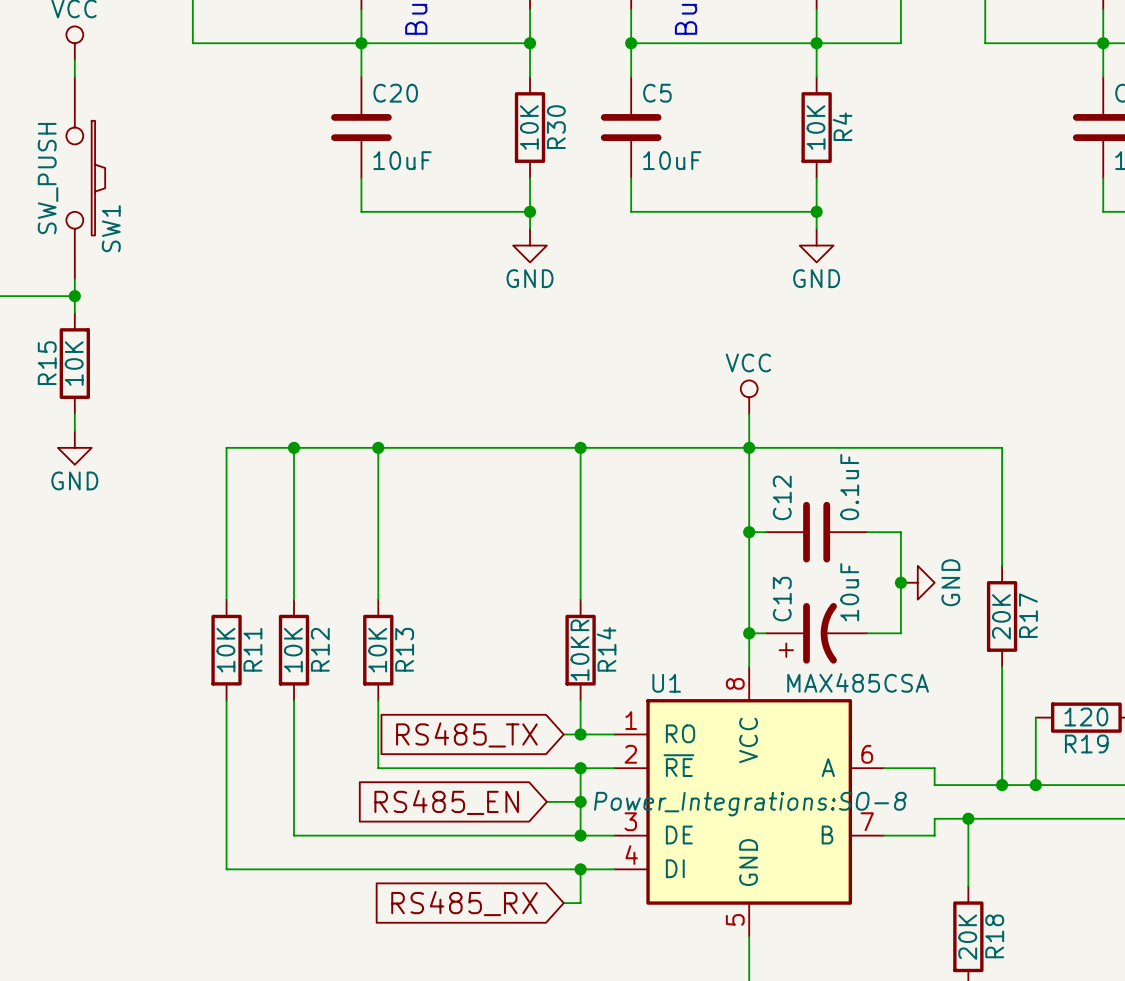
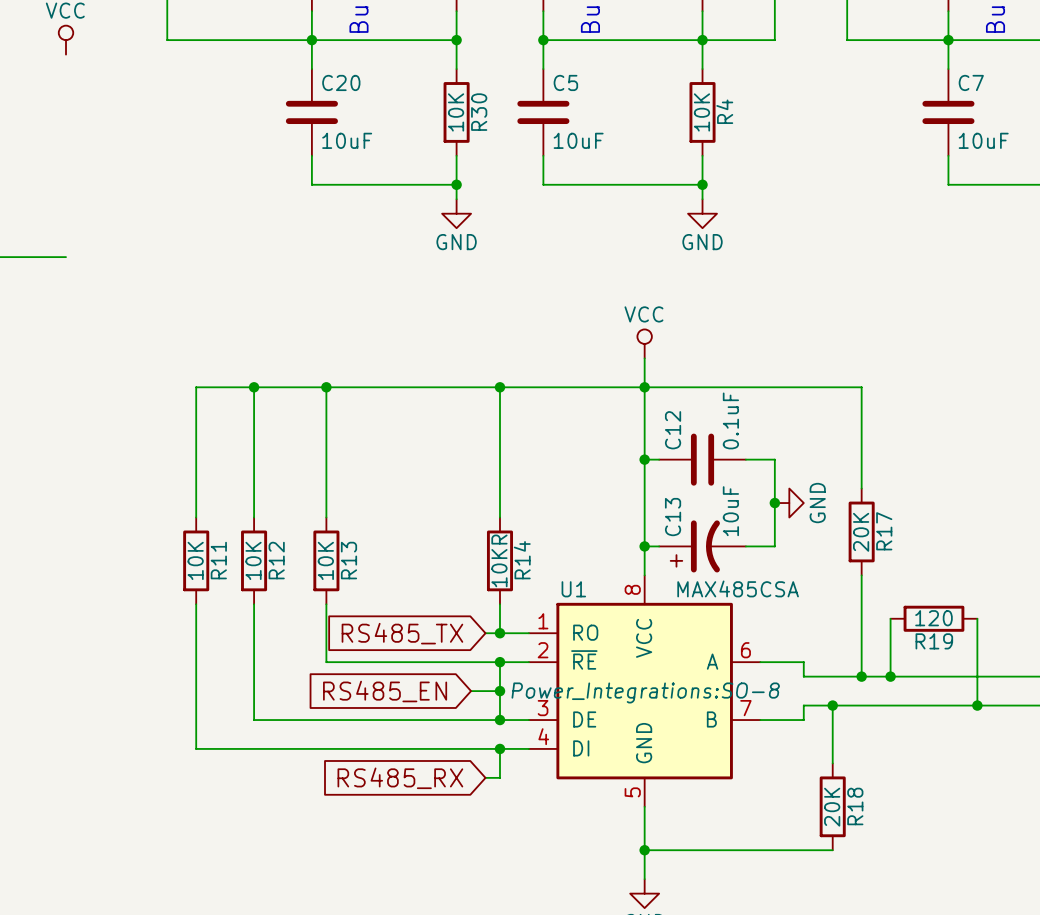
wire: (74, 60) (74, 76) -> none
SW1: SW_PUSH (85, 178) -> none
wire: (74, 279) (74, 312) -> none
junction: (74, 296) -> none
R15: 10K (74, 363) -> none
wire: (74, 414) (74, 431) -> none
power symbol: GND (74, 447) -> none

